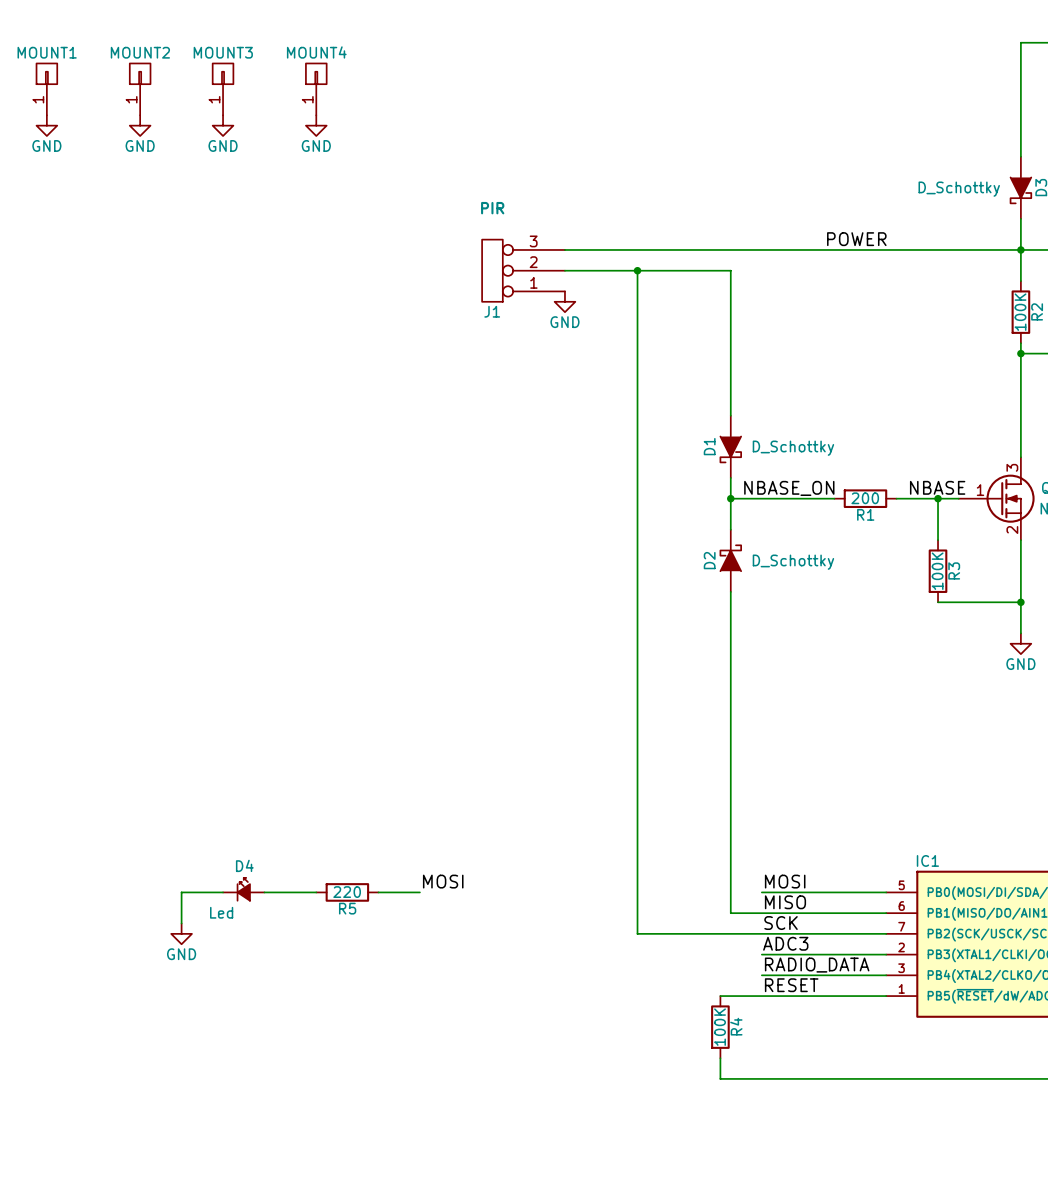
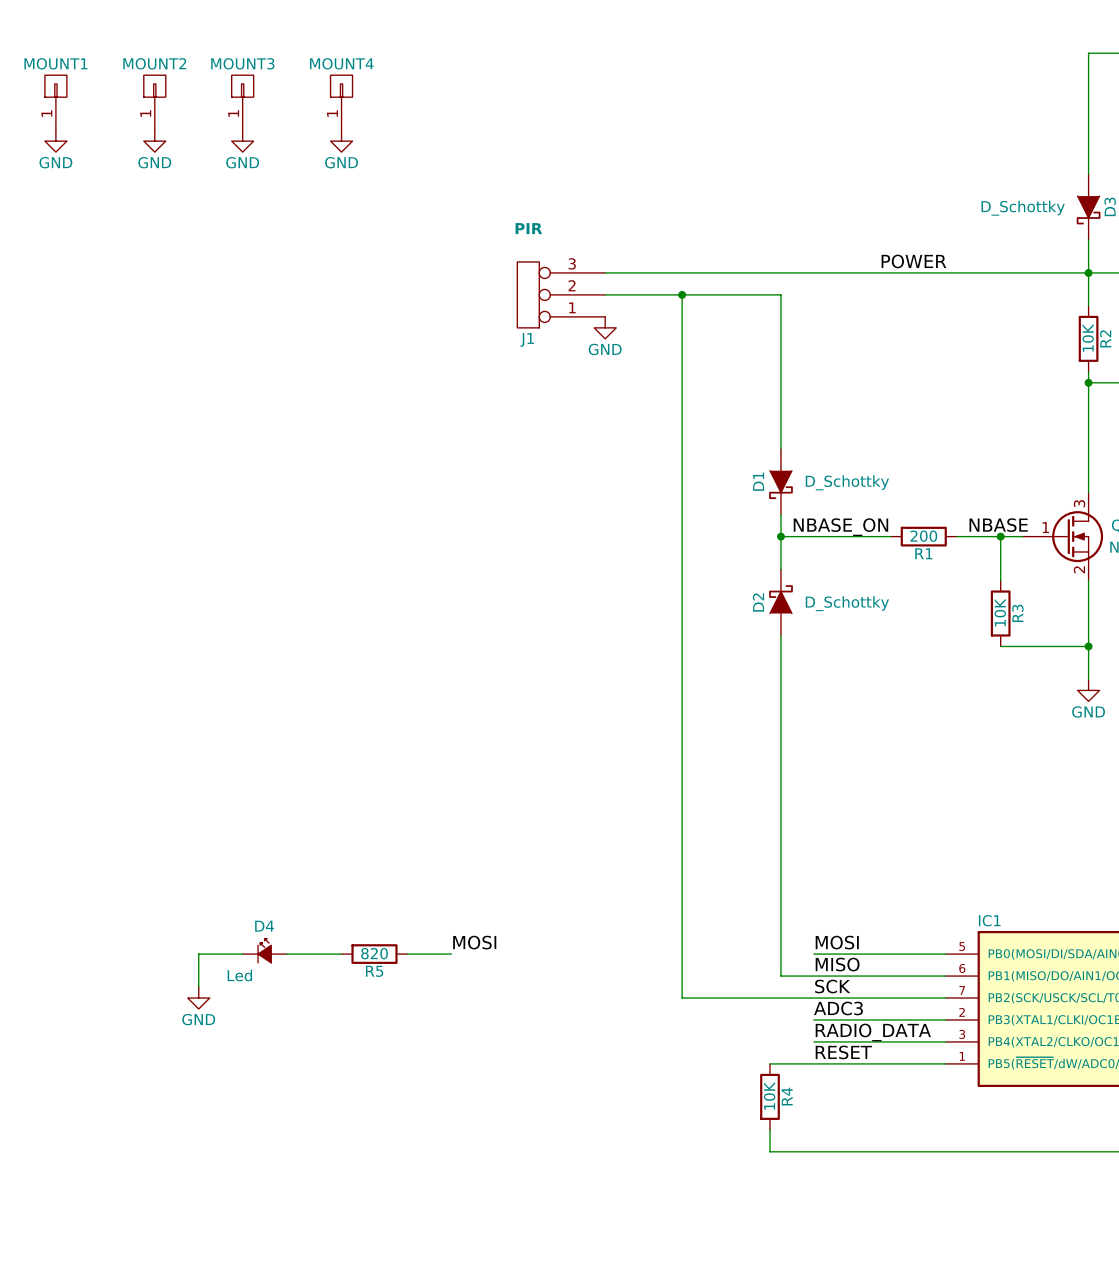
R2 value: 100K (1020, 312) -> 10K (1088, 337)
R3 value: 100K (937, 571) -> 10K (1000, 612)
R5 value: 220 (347, 892) -> 820 (374, 953)
R4 value: 100K (720, 1027) -> 10K (769, 1095)

